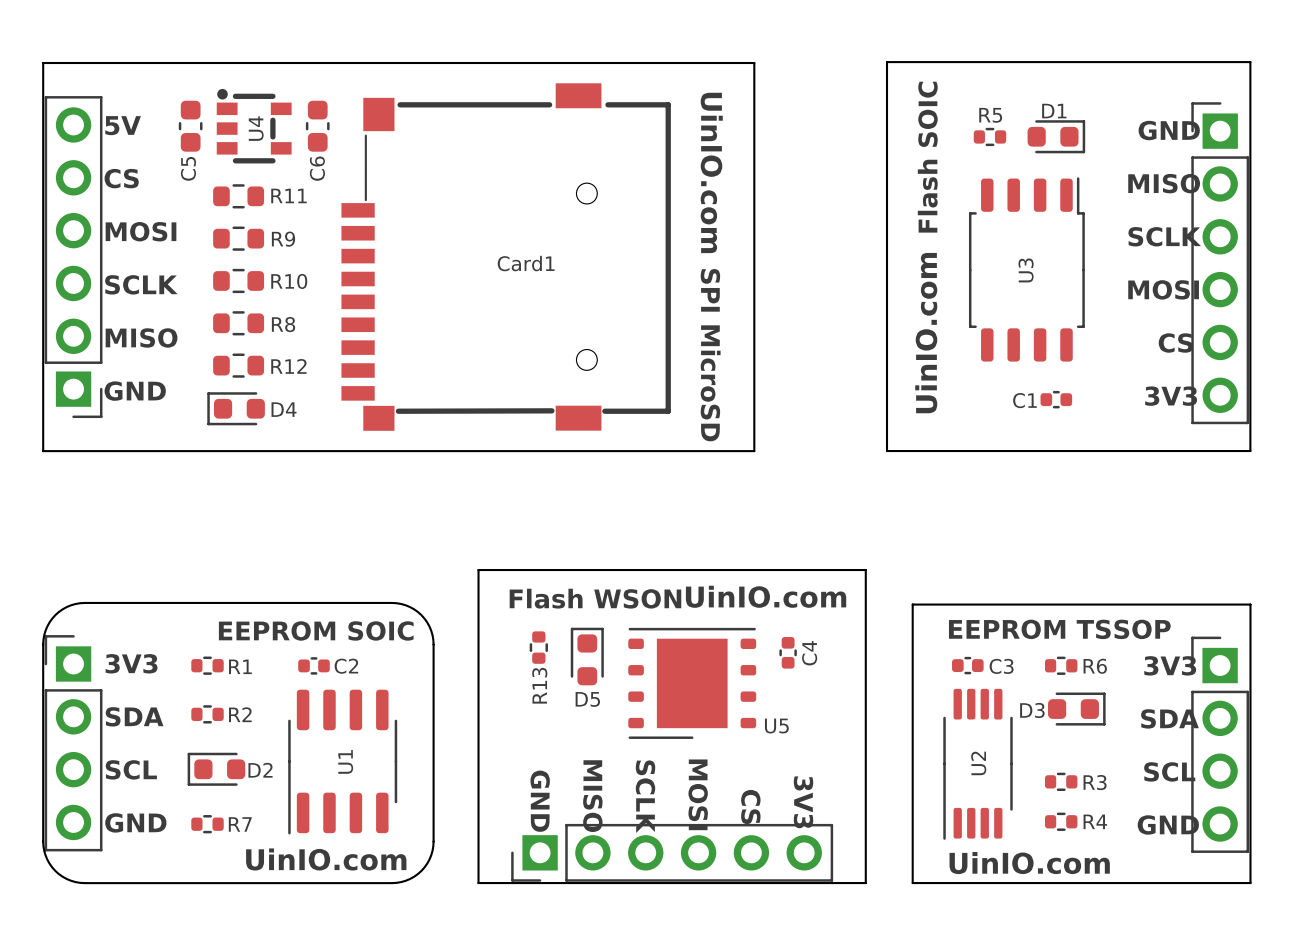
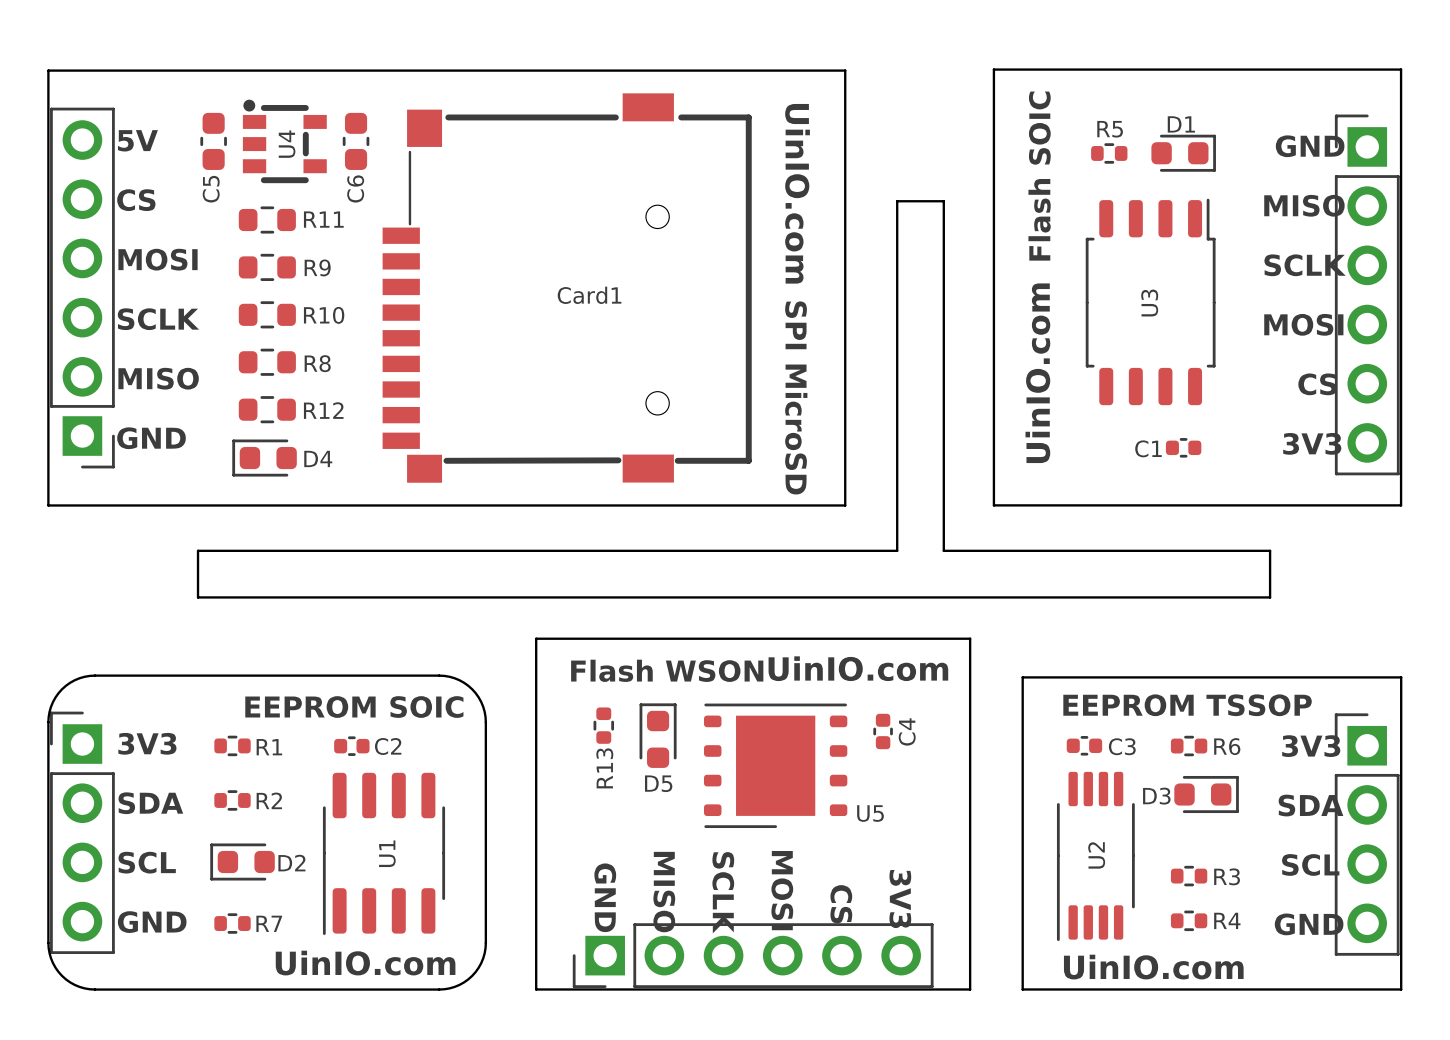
board edge: none -> (897, 201) (943, 201) (943, 550) (1270, 550) (1270, 597) (198, 597) (198, 550) (897, 550) (897, 201)

